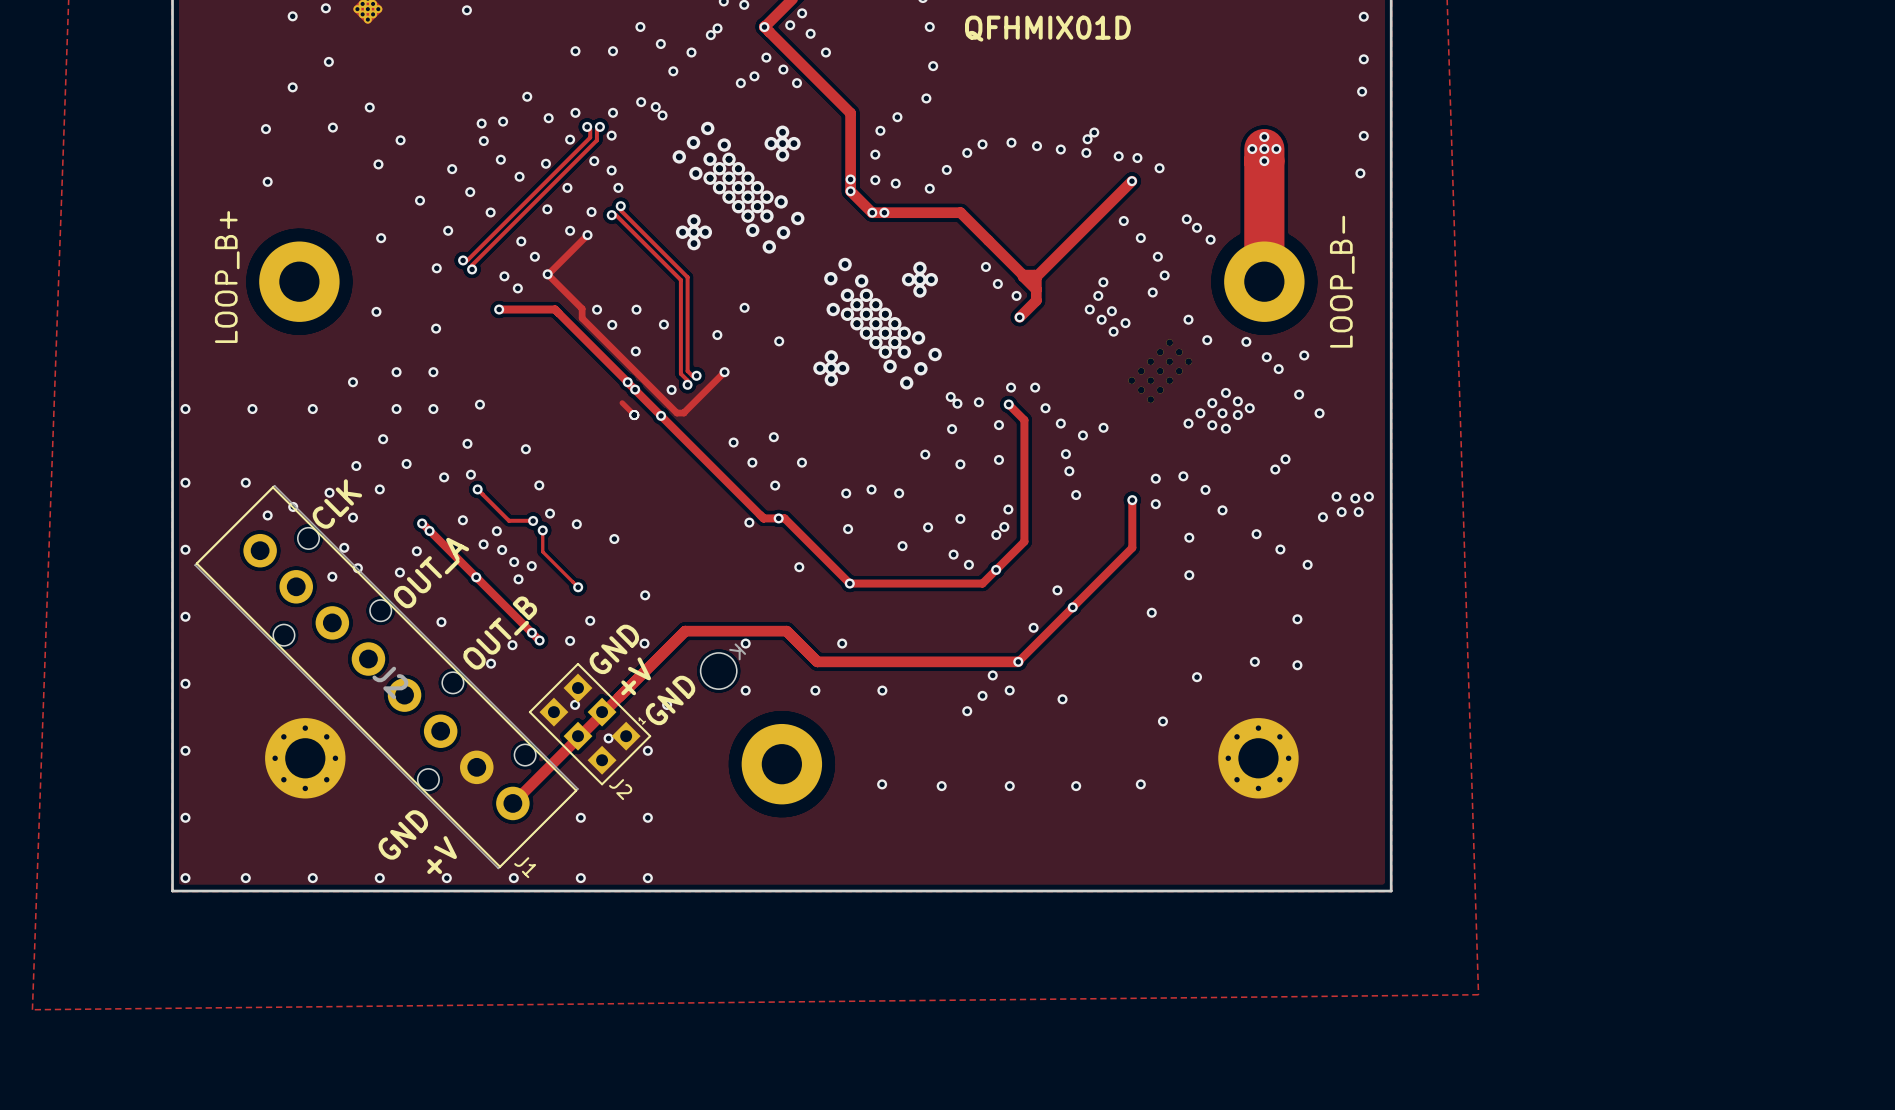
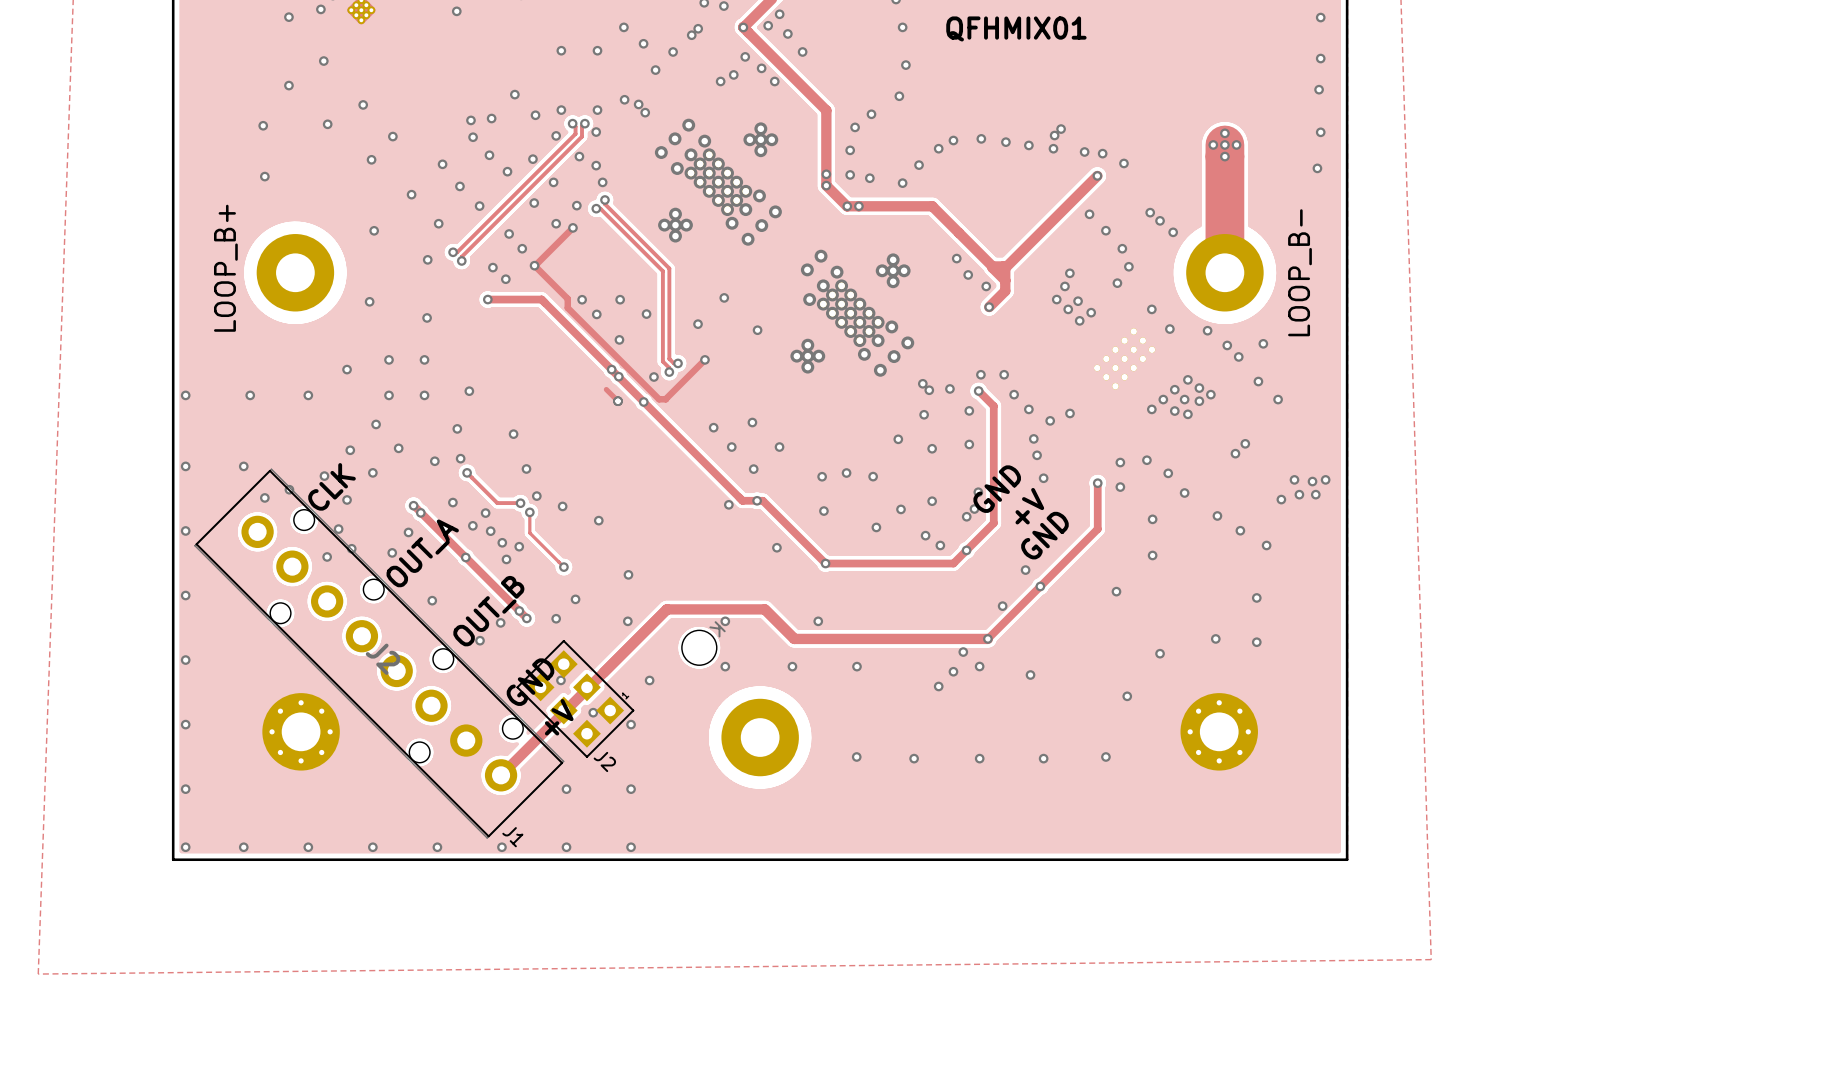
text: QFHMIX01D (1047, 28) -> QFHMIX01 (1016, 28)
text: none -> GND (997, 489)
text: none -> +V (1029, 506)
text: none -> GND (1044, 535)
text position: GND (614, 649) -> GND (530, 682)
text position: +V (636, 676) -> +V (559, 717)
text: GND (670, 700) -> none
text: GND (403, 834) -> none
text: +V (442, 855) -> none

